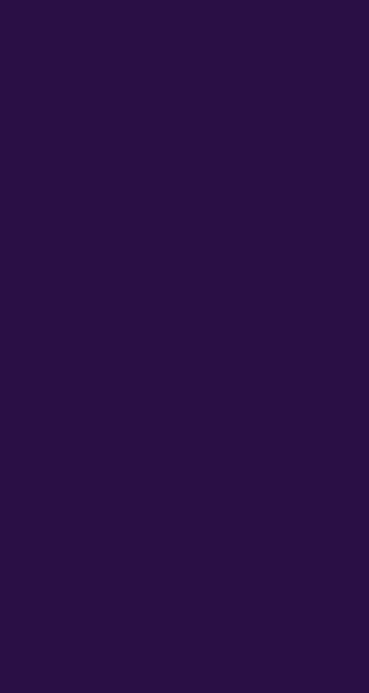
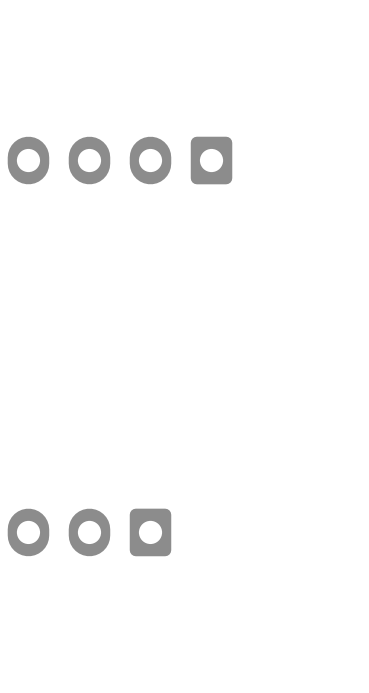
part: none -> (119, 160)
part: none -> (89, 532)

